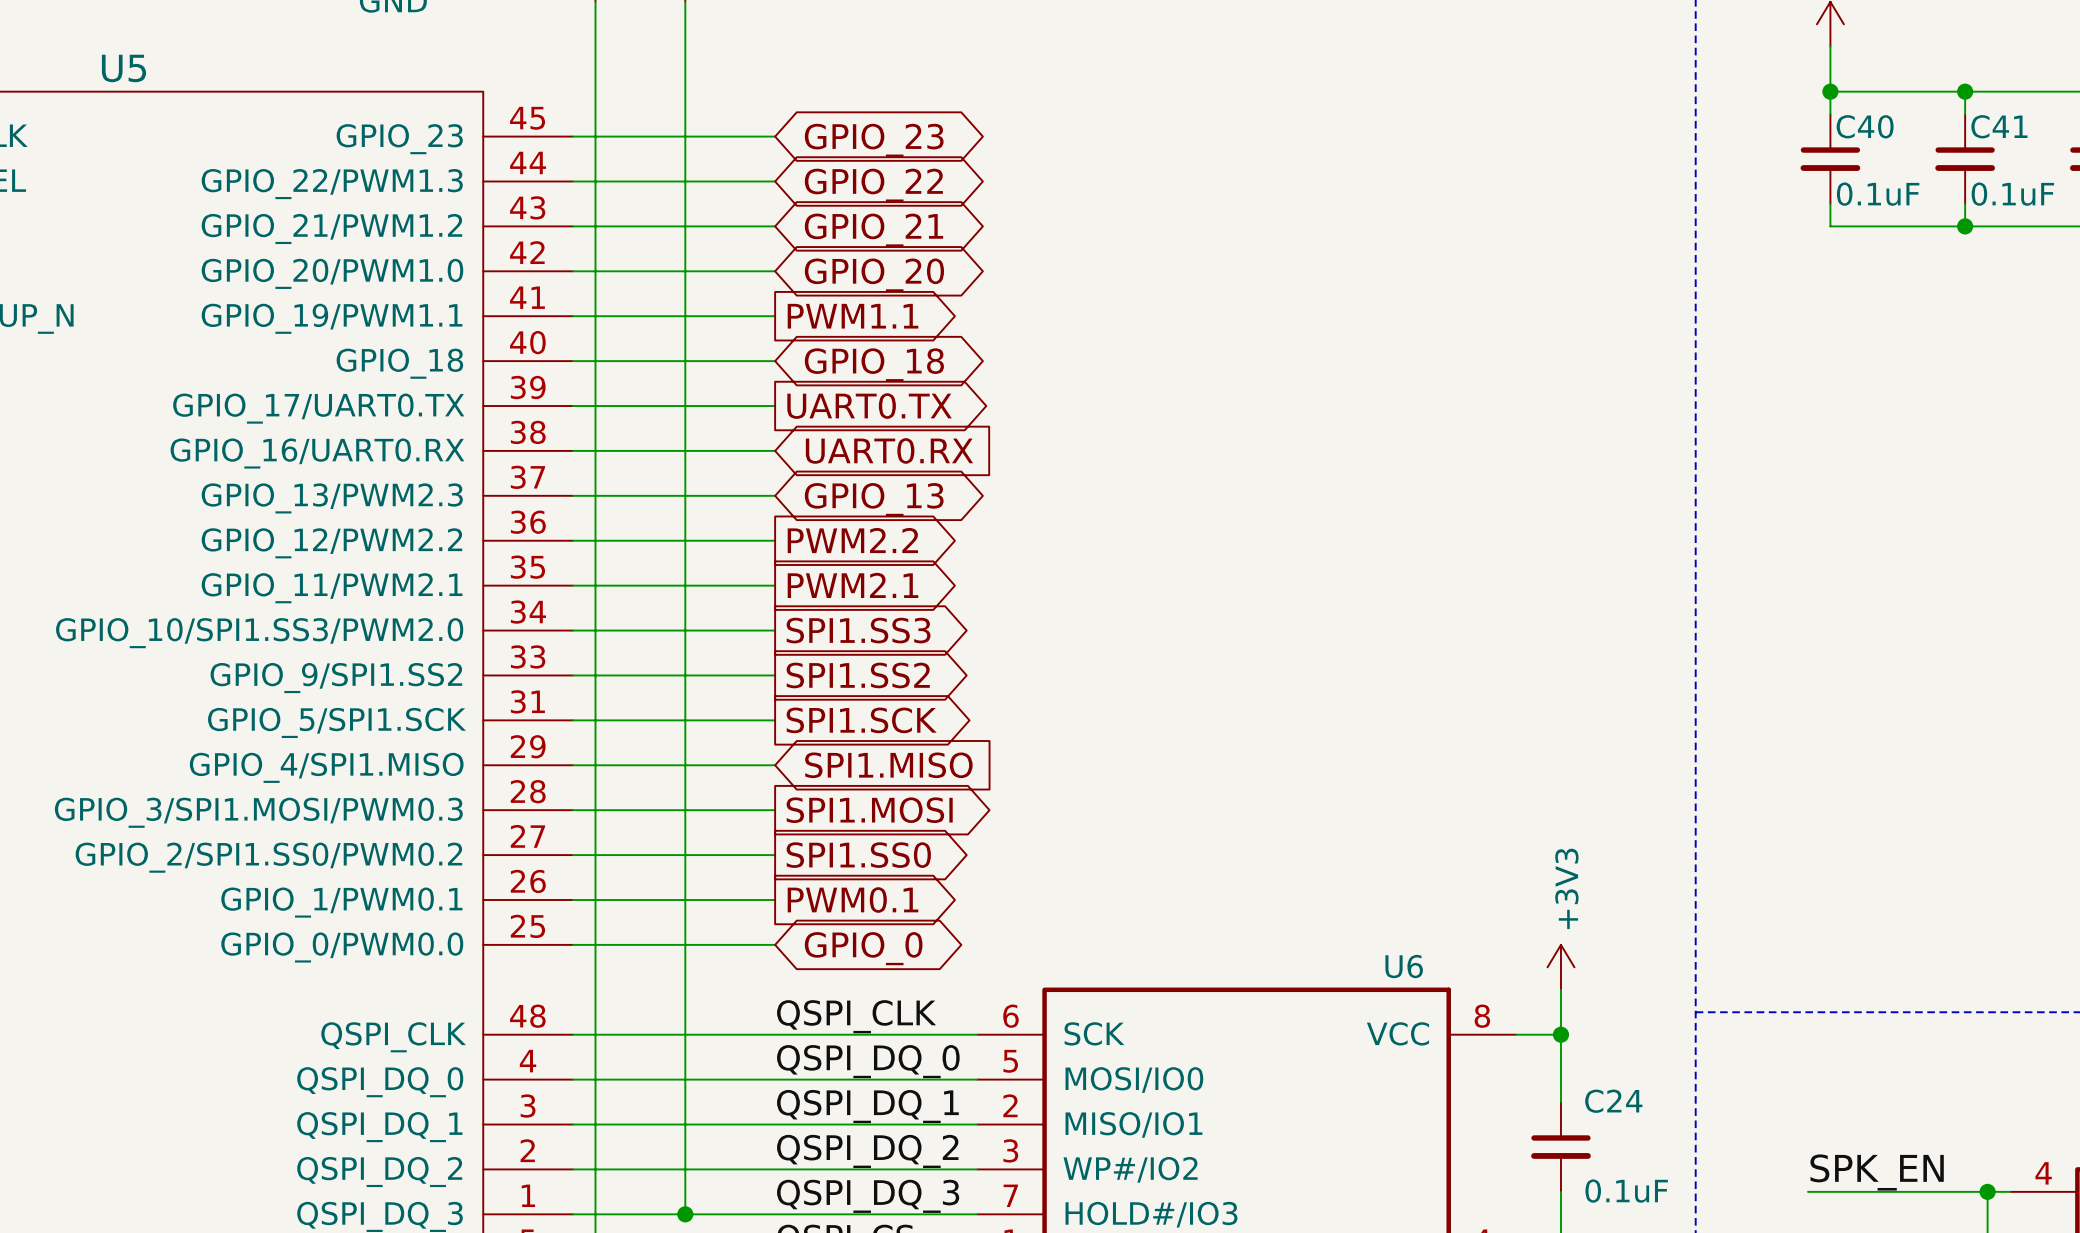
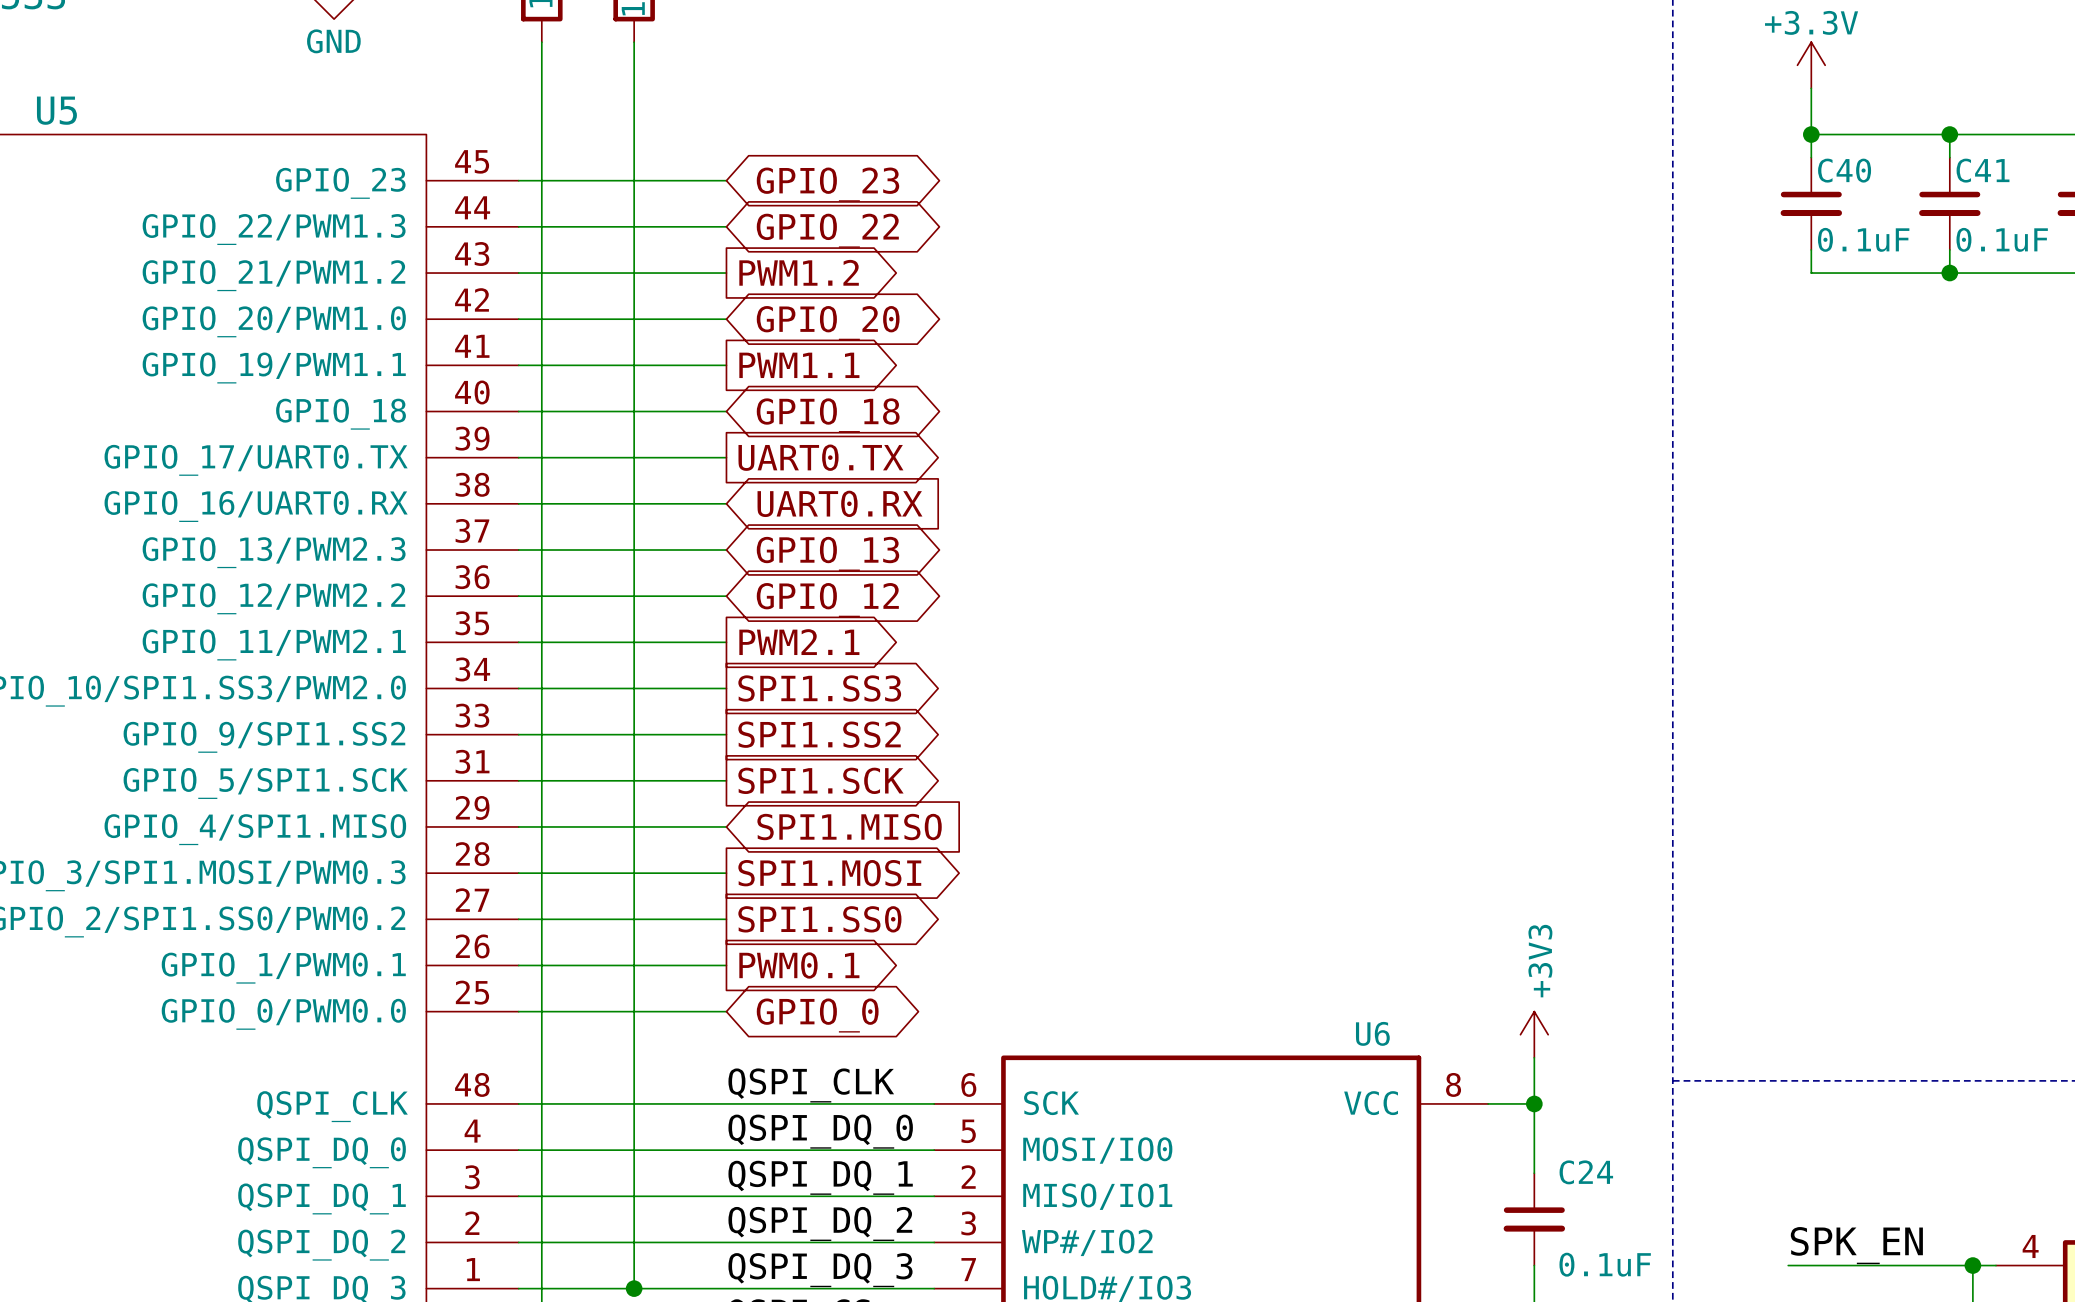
global label shape: bidirectional (873, 230) -> output (799, 272)
global label: GPIO_21 (873, 230) -> PWM1.2 (799, 272)
global label shape: output (852, 540) -> bidirectional (827, 600)
global label: PWM2.2 (852, 540) -> GPIO_12 (827, 600)

